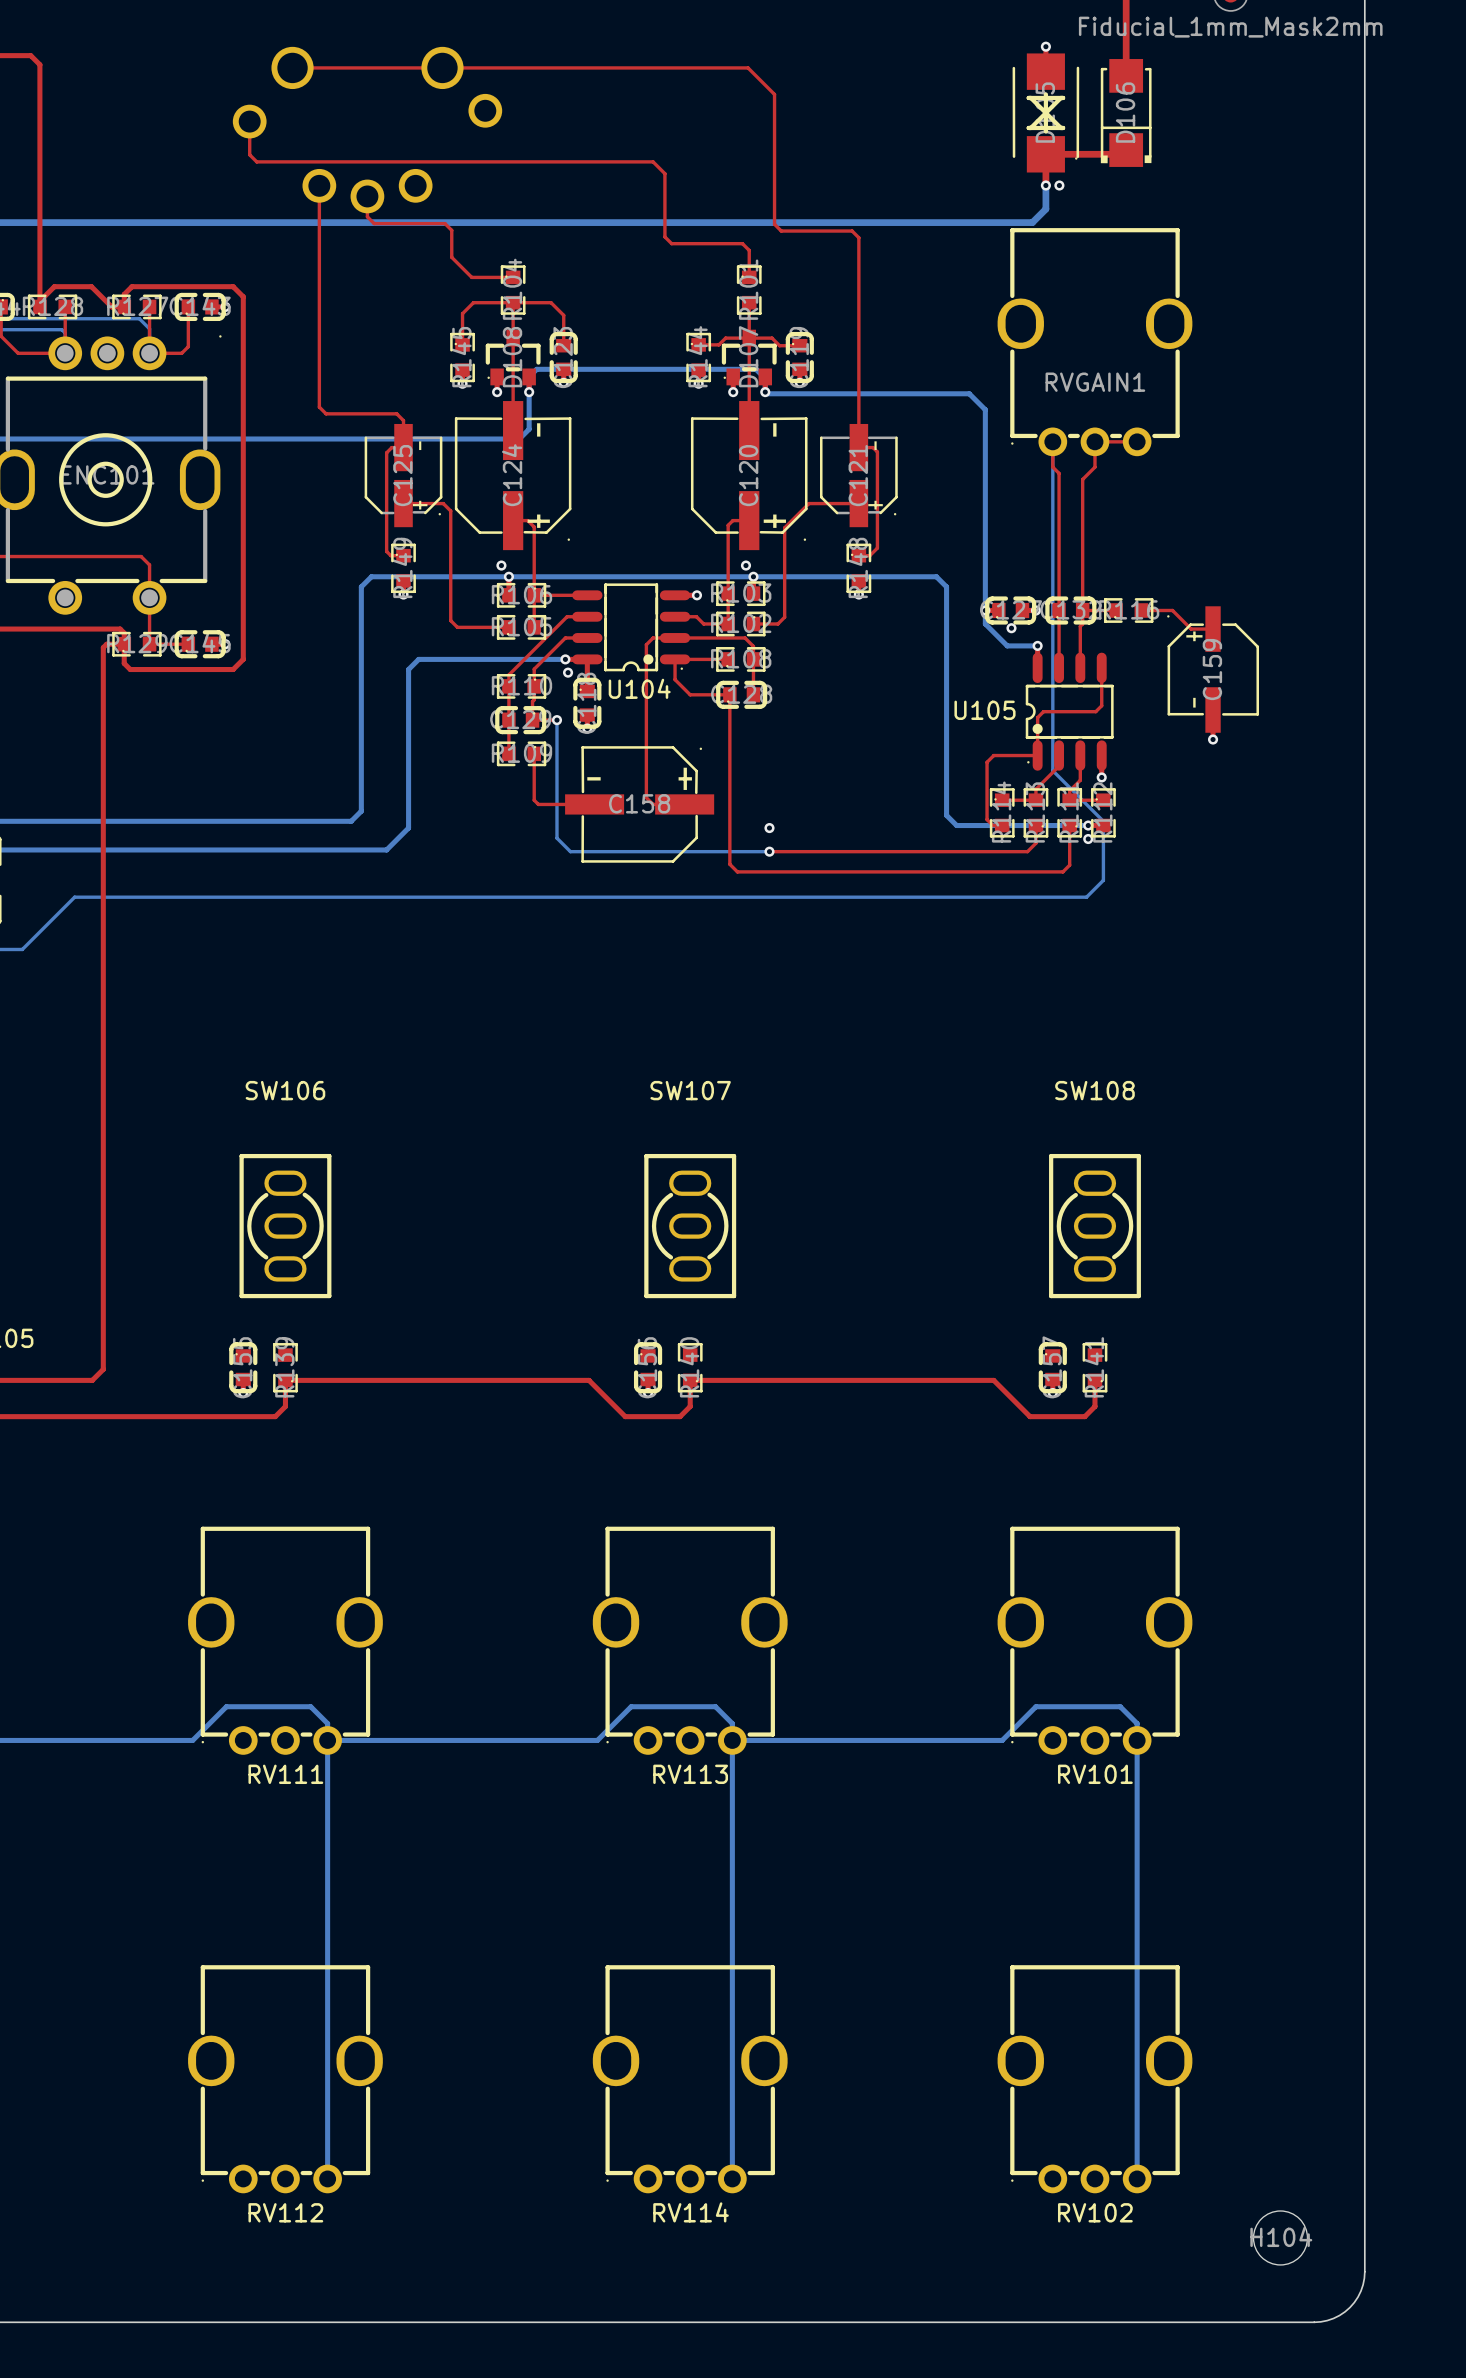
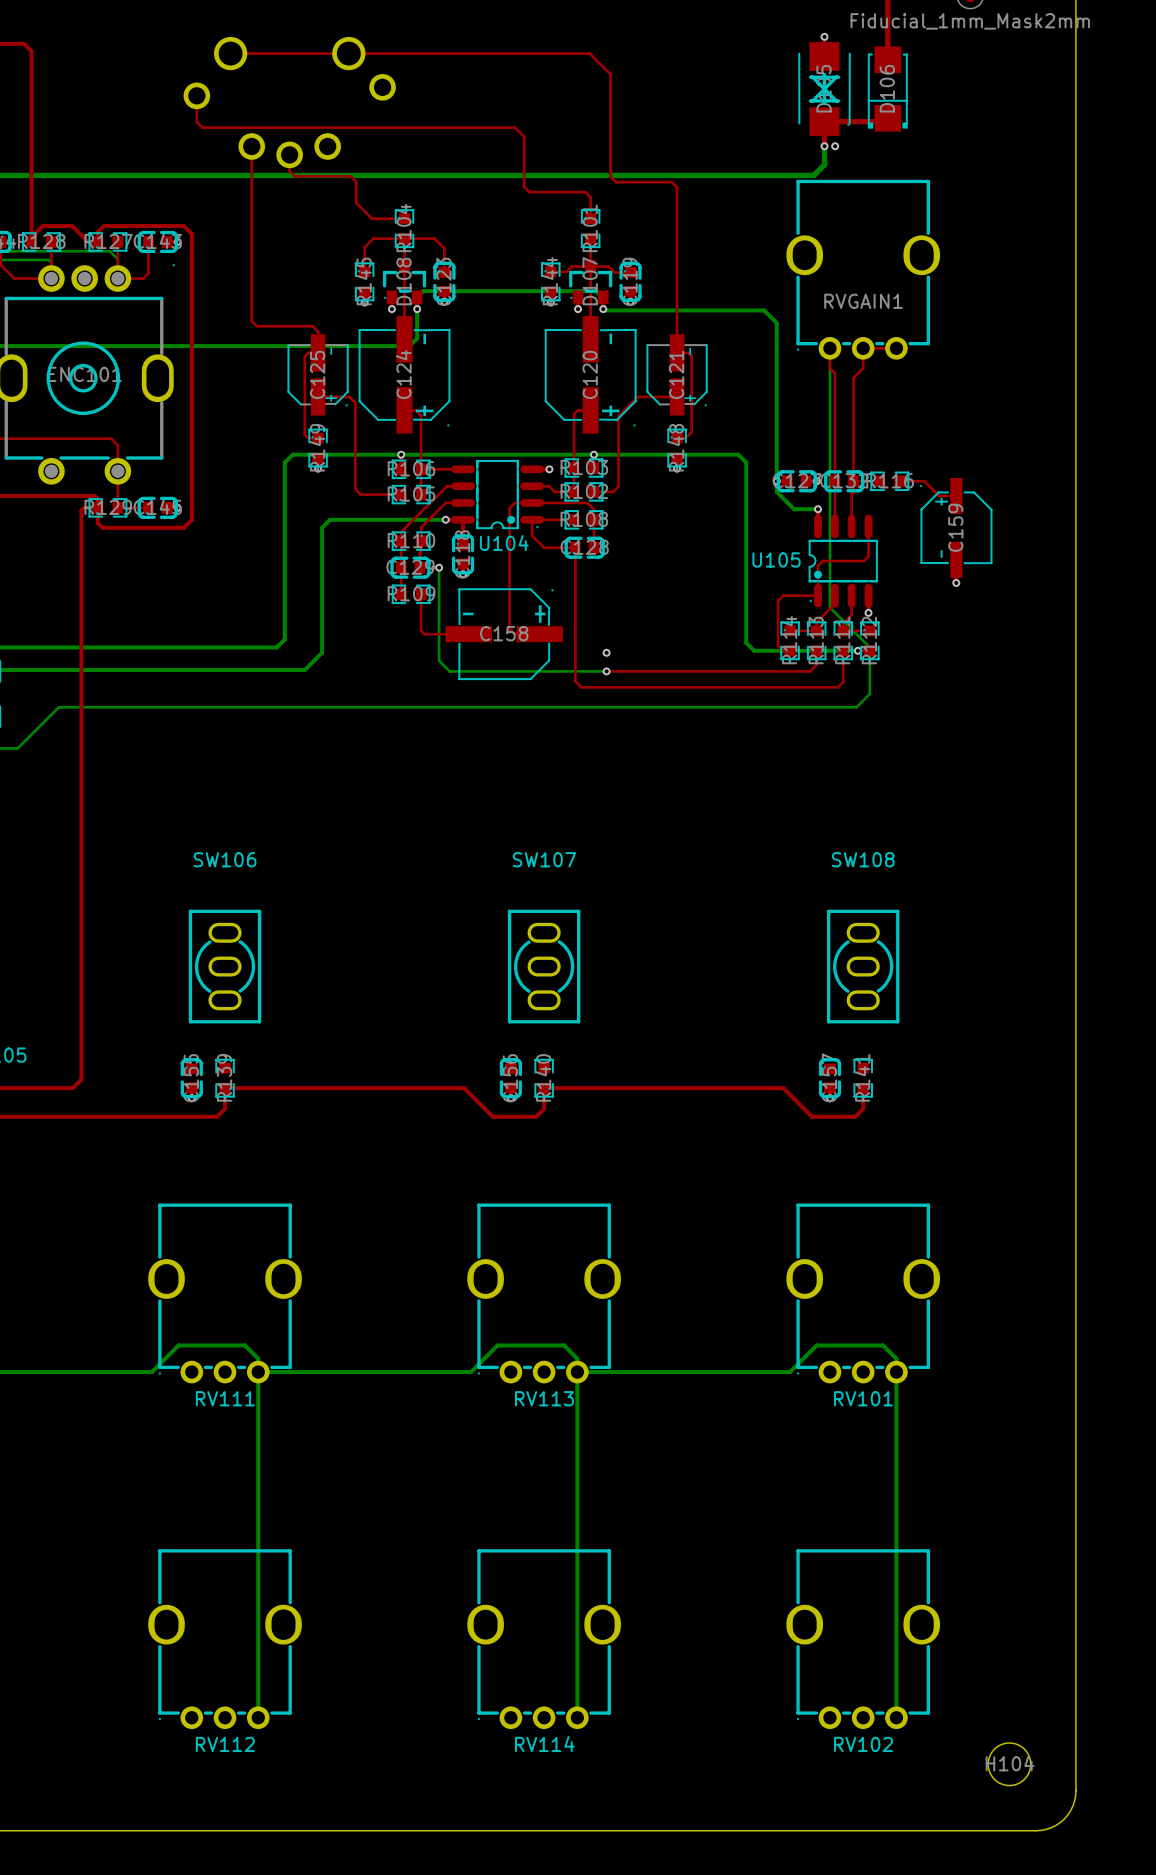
via: (501, 565) -> none
via: (745, 565) -> none
via: (1011, 628) -> none
via: (568, 672) -> none
via: (1088, 839) -> none

